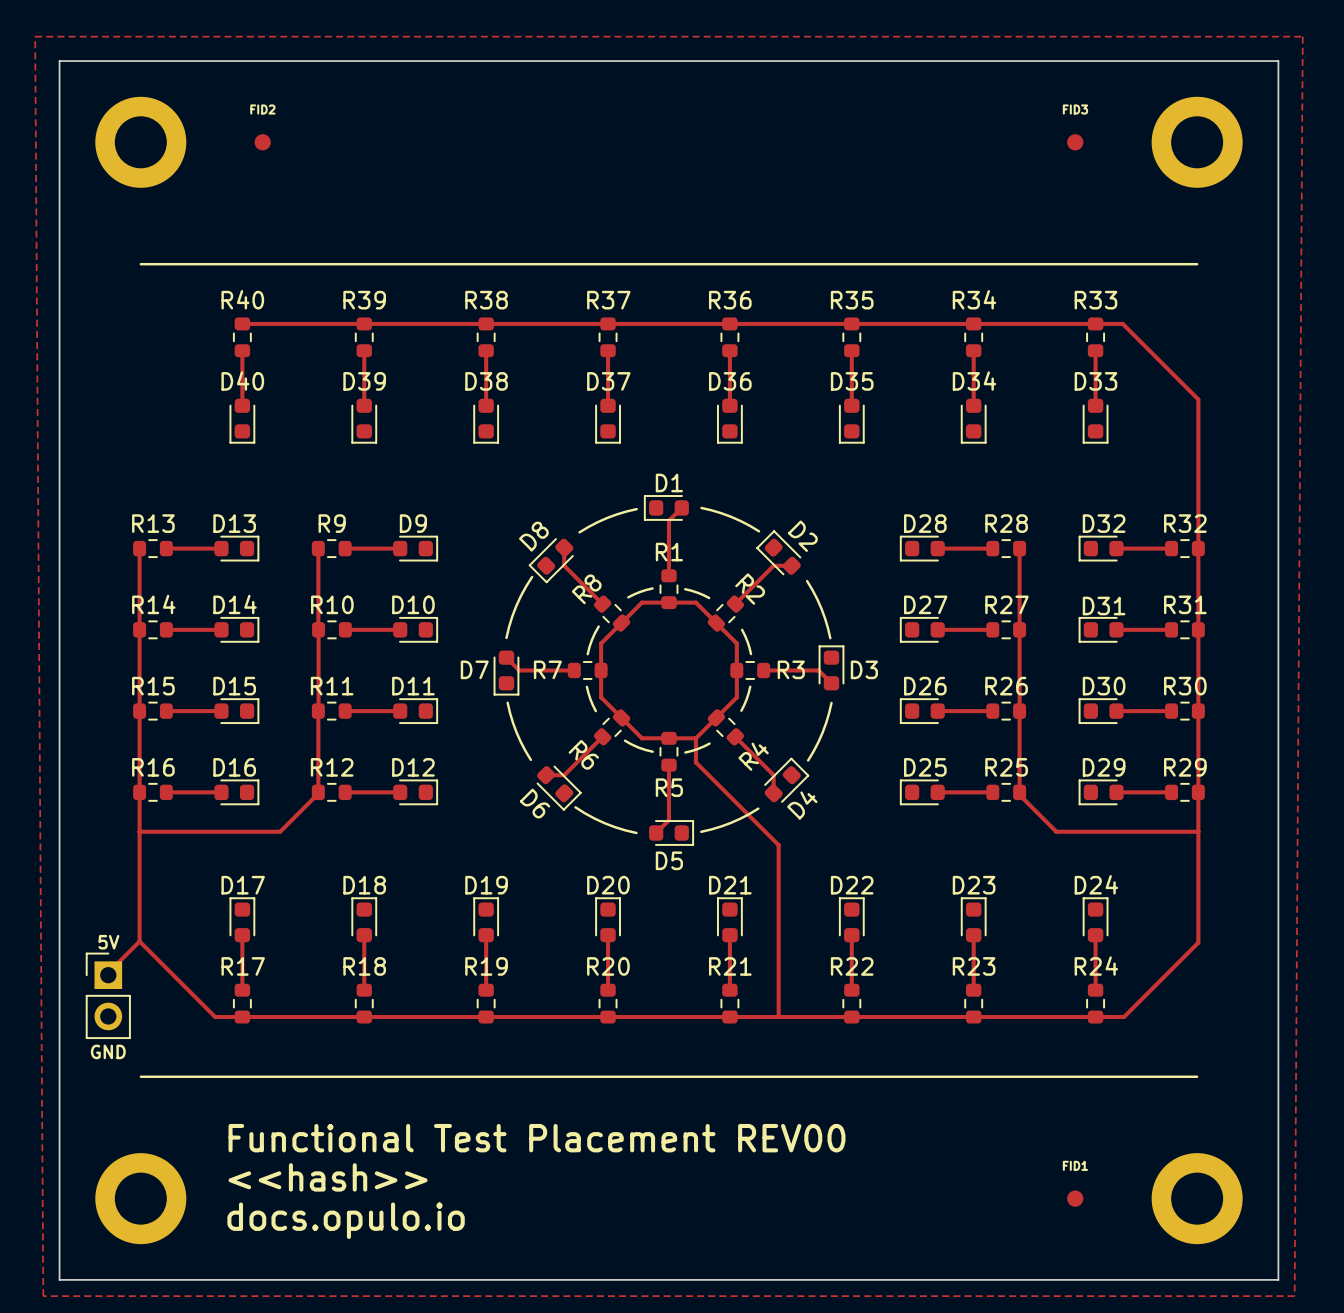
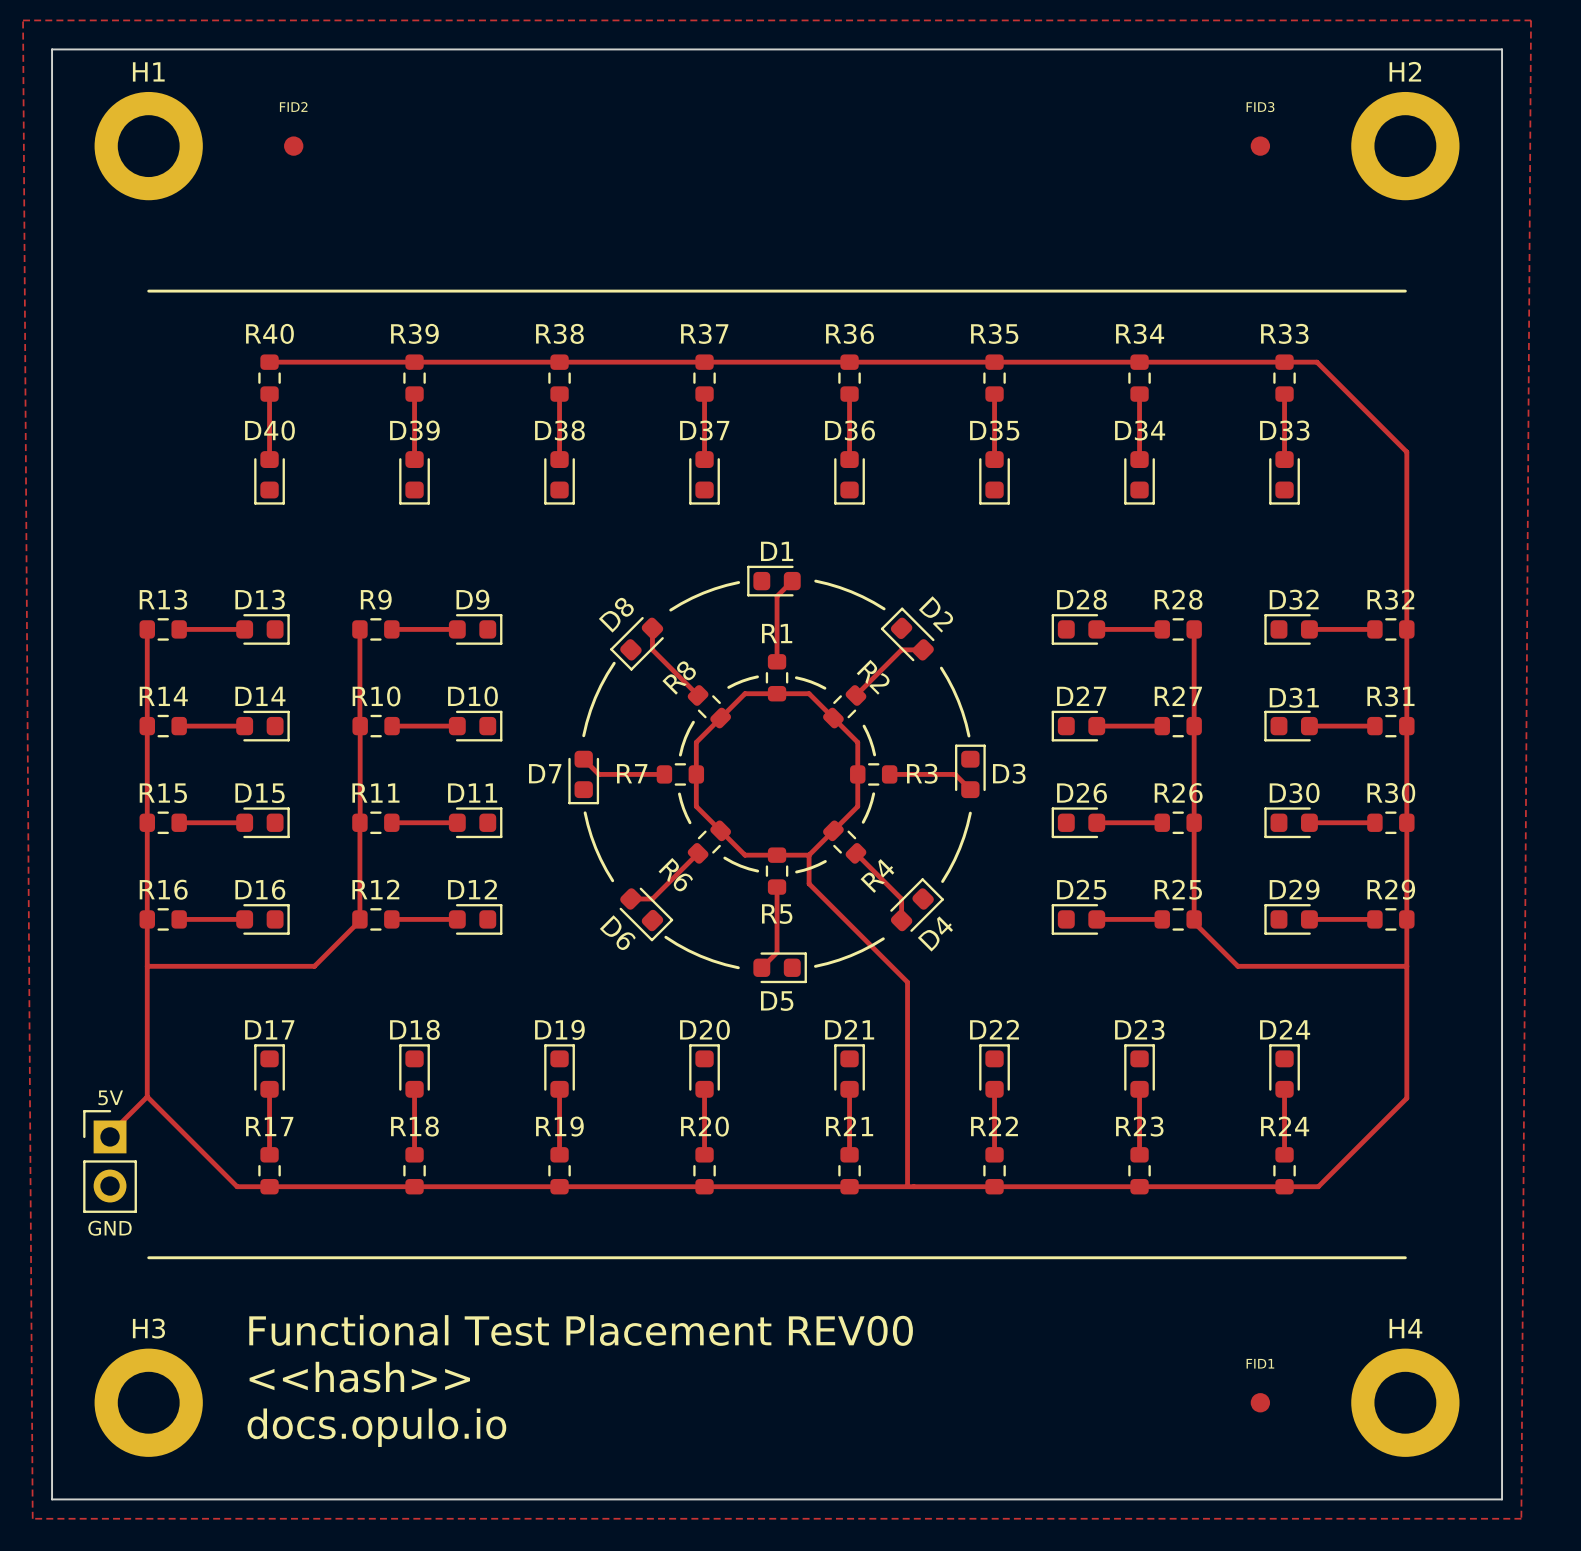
H1 name: none -> H1 (148, 71)
H2 name: none -> H2 (1405, 71)
H4 name: none -> H4 (1405, 1328)
H3 name: none -> H3 (148, 1328)

